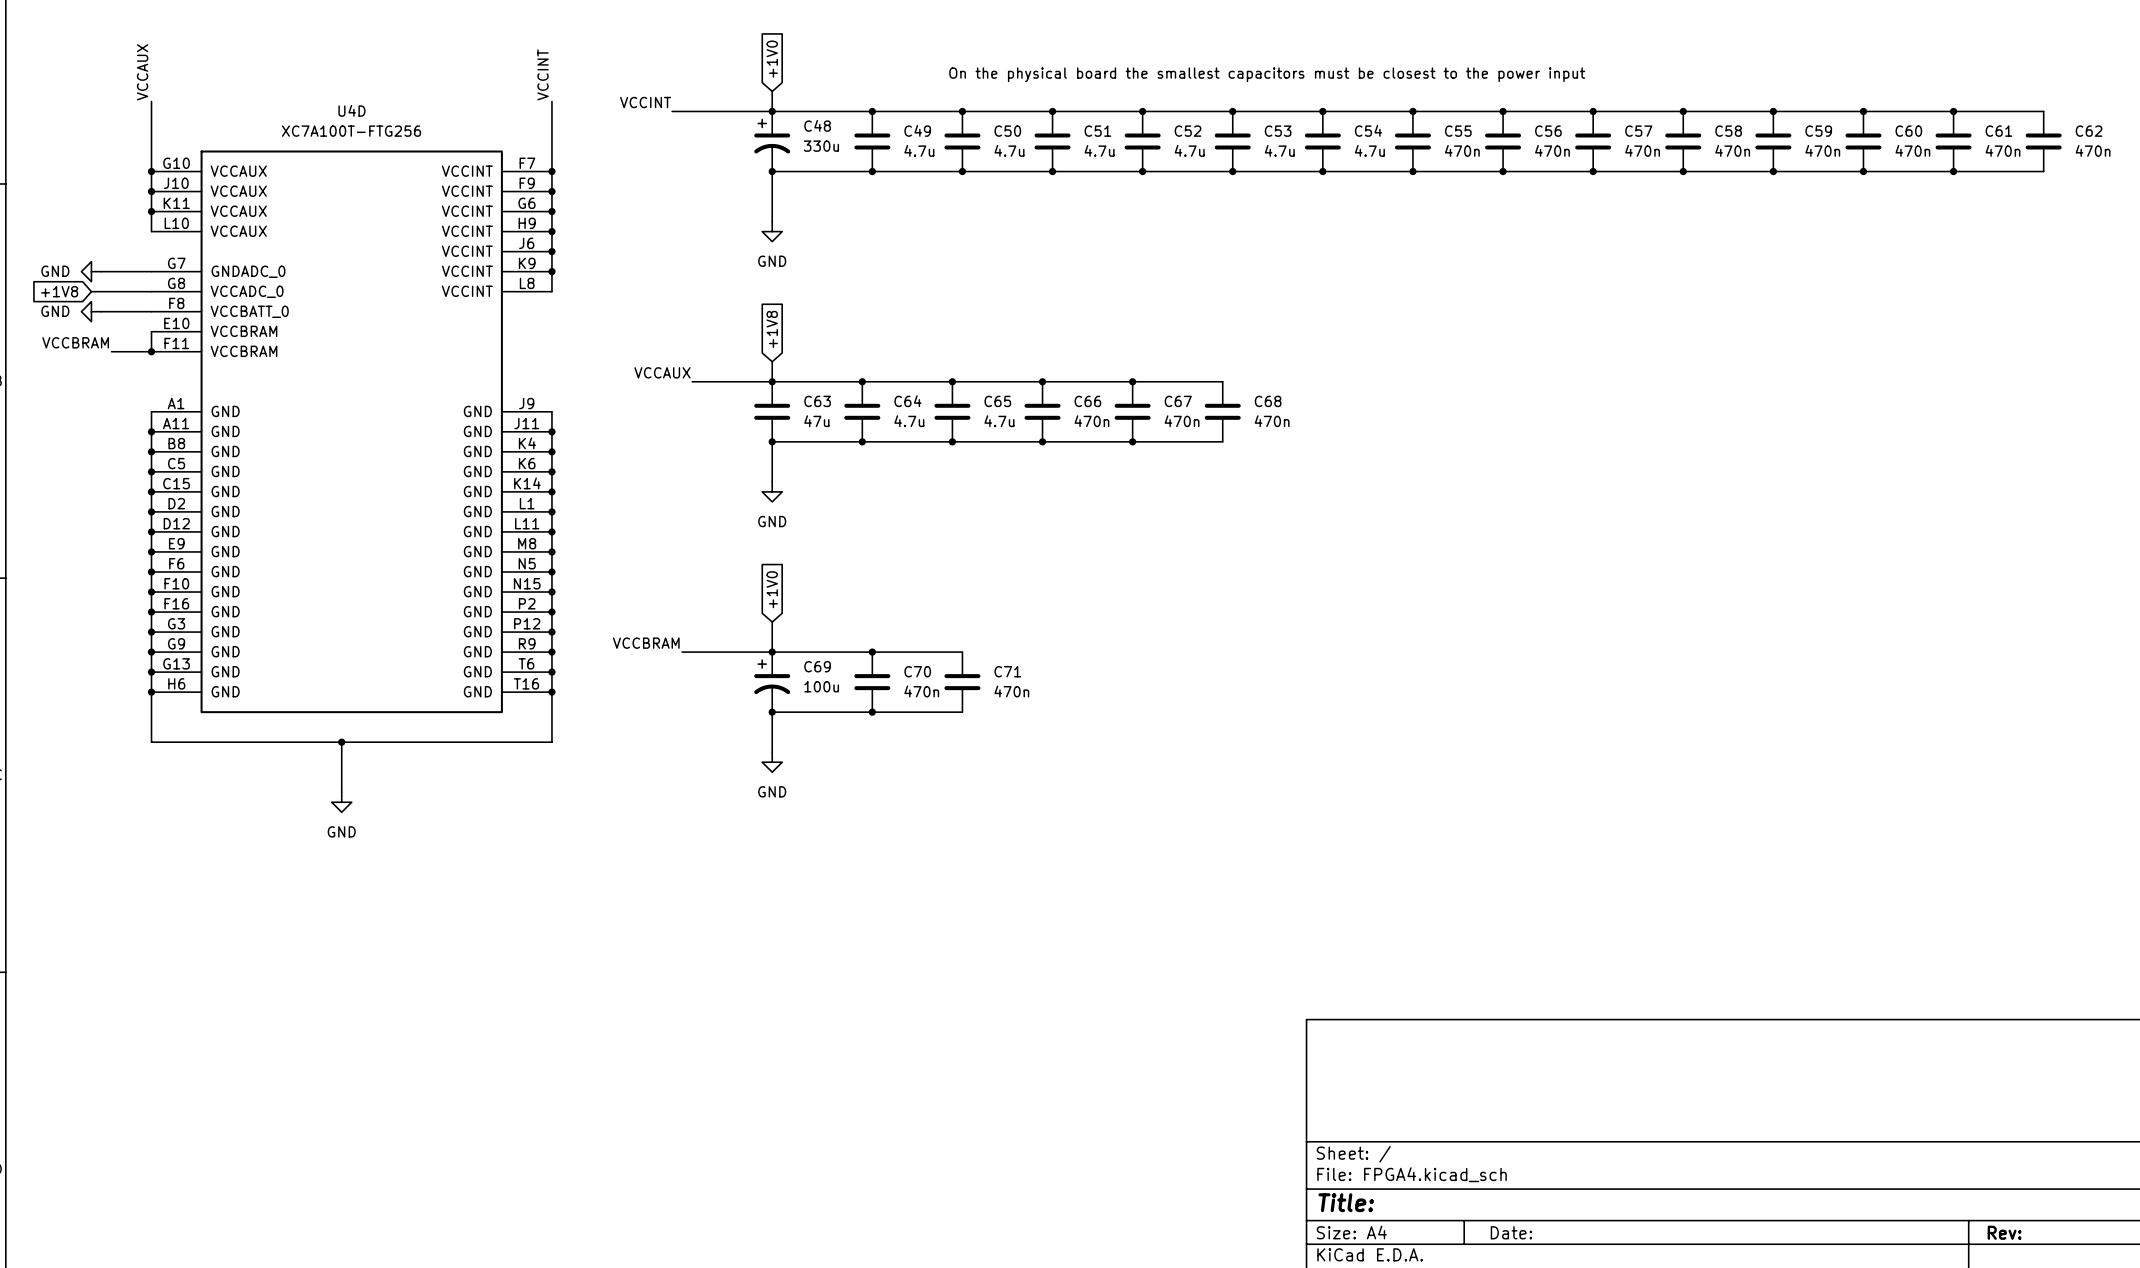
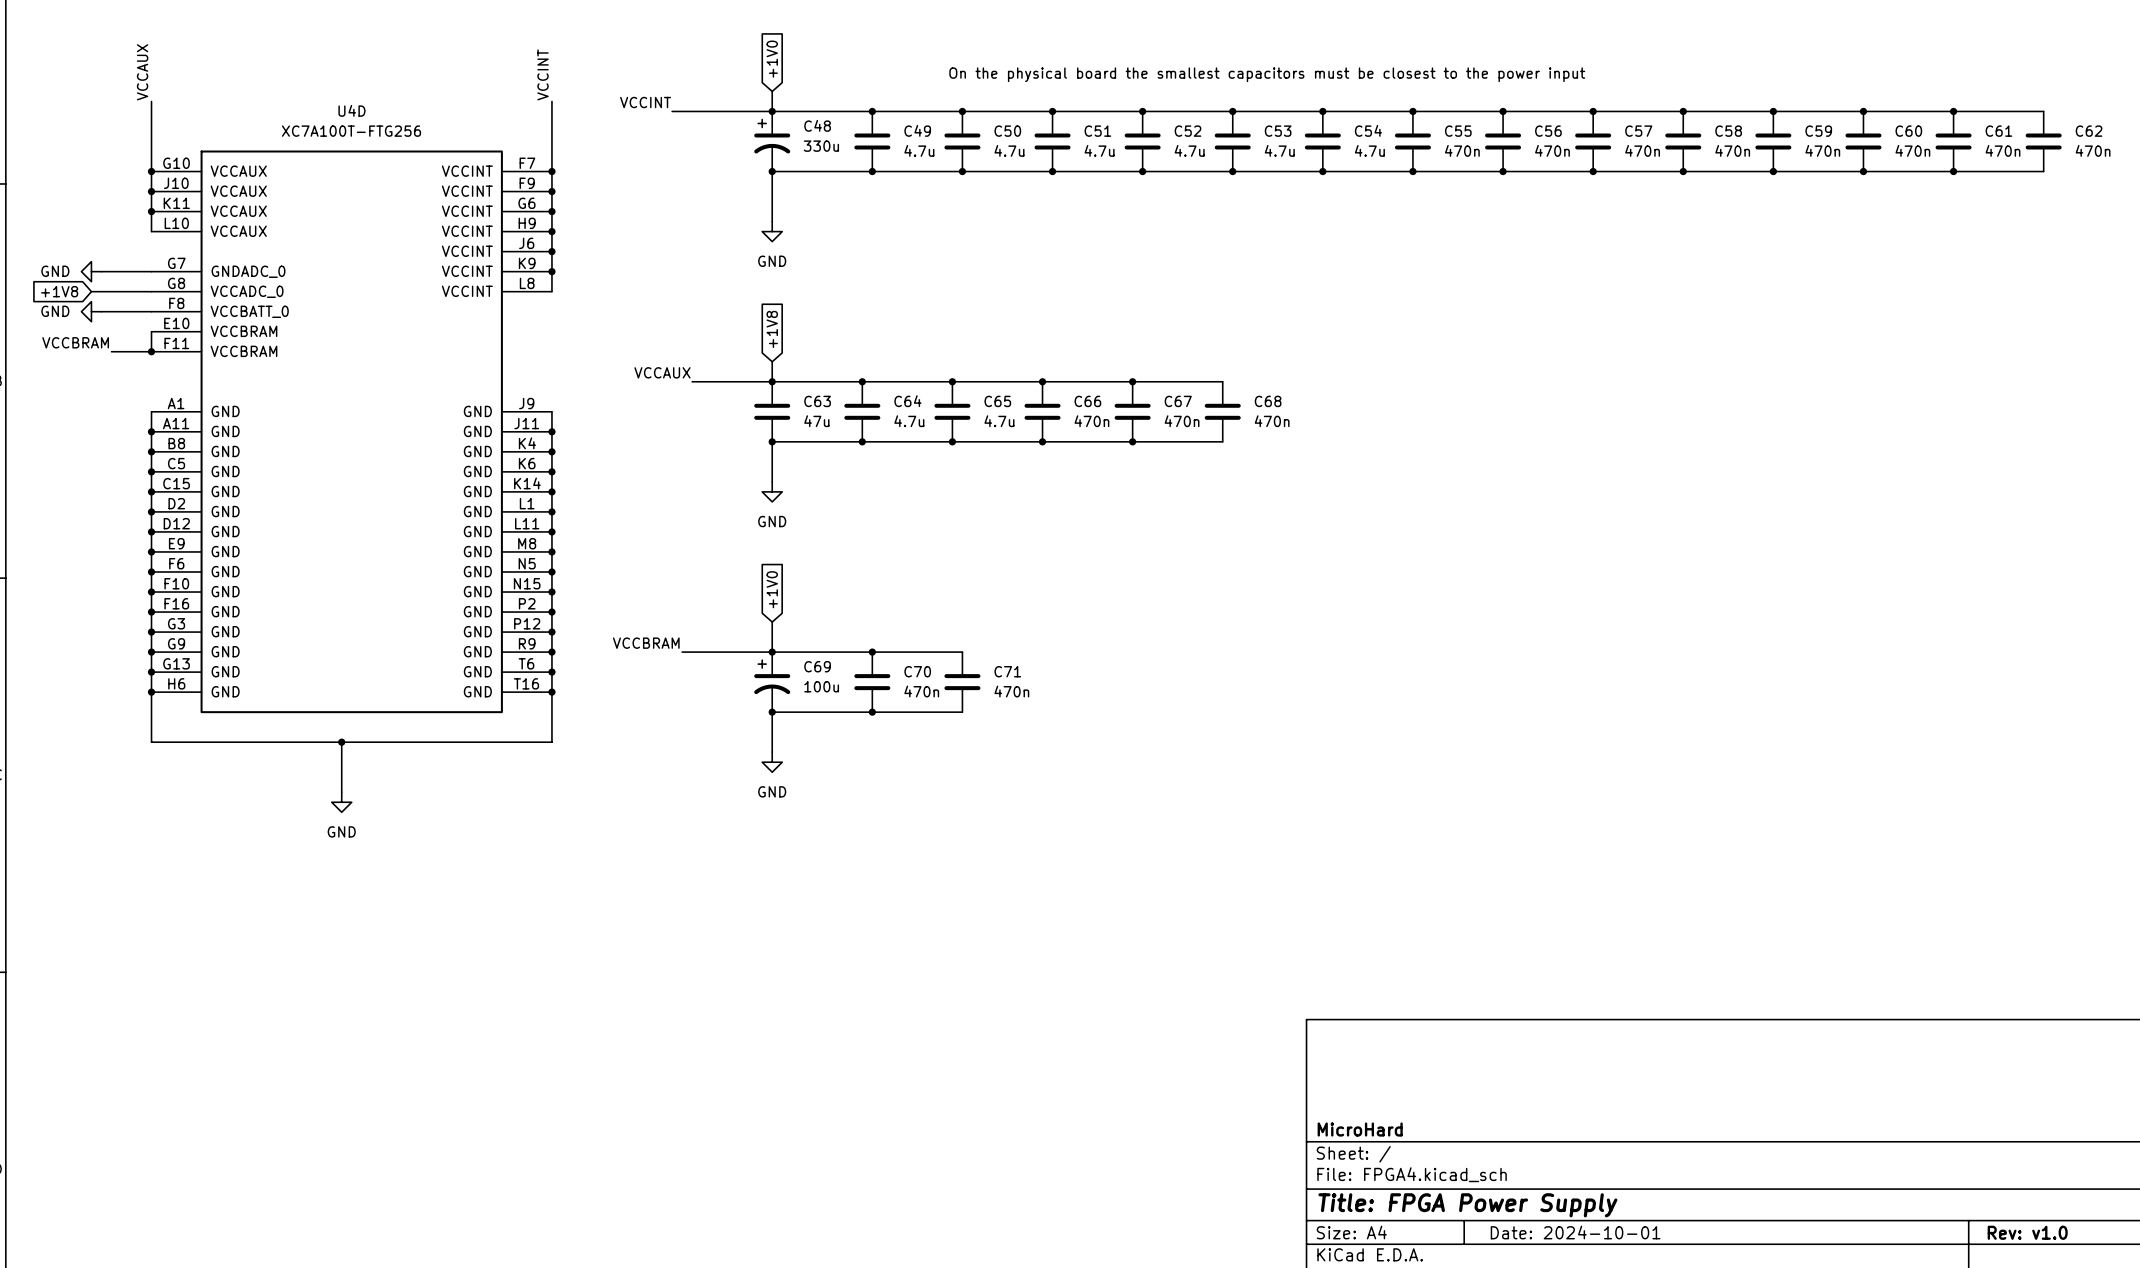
title block: none -> MicroHard (1360, 1129)
title block: Title: (1346, 1202) -> Title: FPGA Power Supply (1467, 1205)
title block: Date: (1511, 1232) -> Date: 2024-10-01 (1575, 1232)
title block: Rev: (2004, 1232) -> Rev: v1.0 (2027, 1232)

